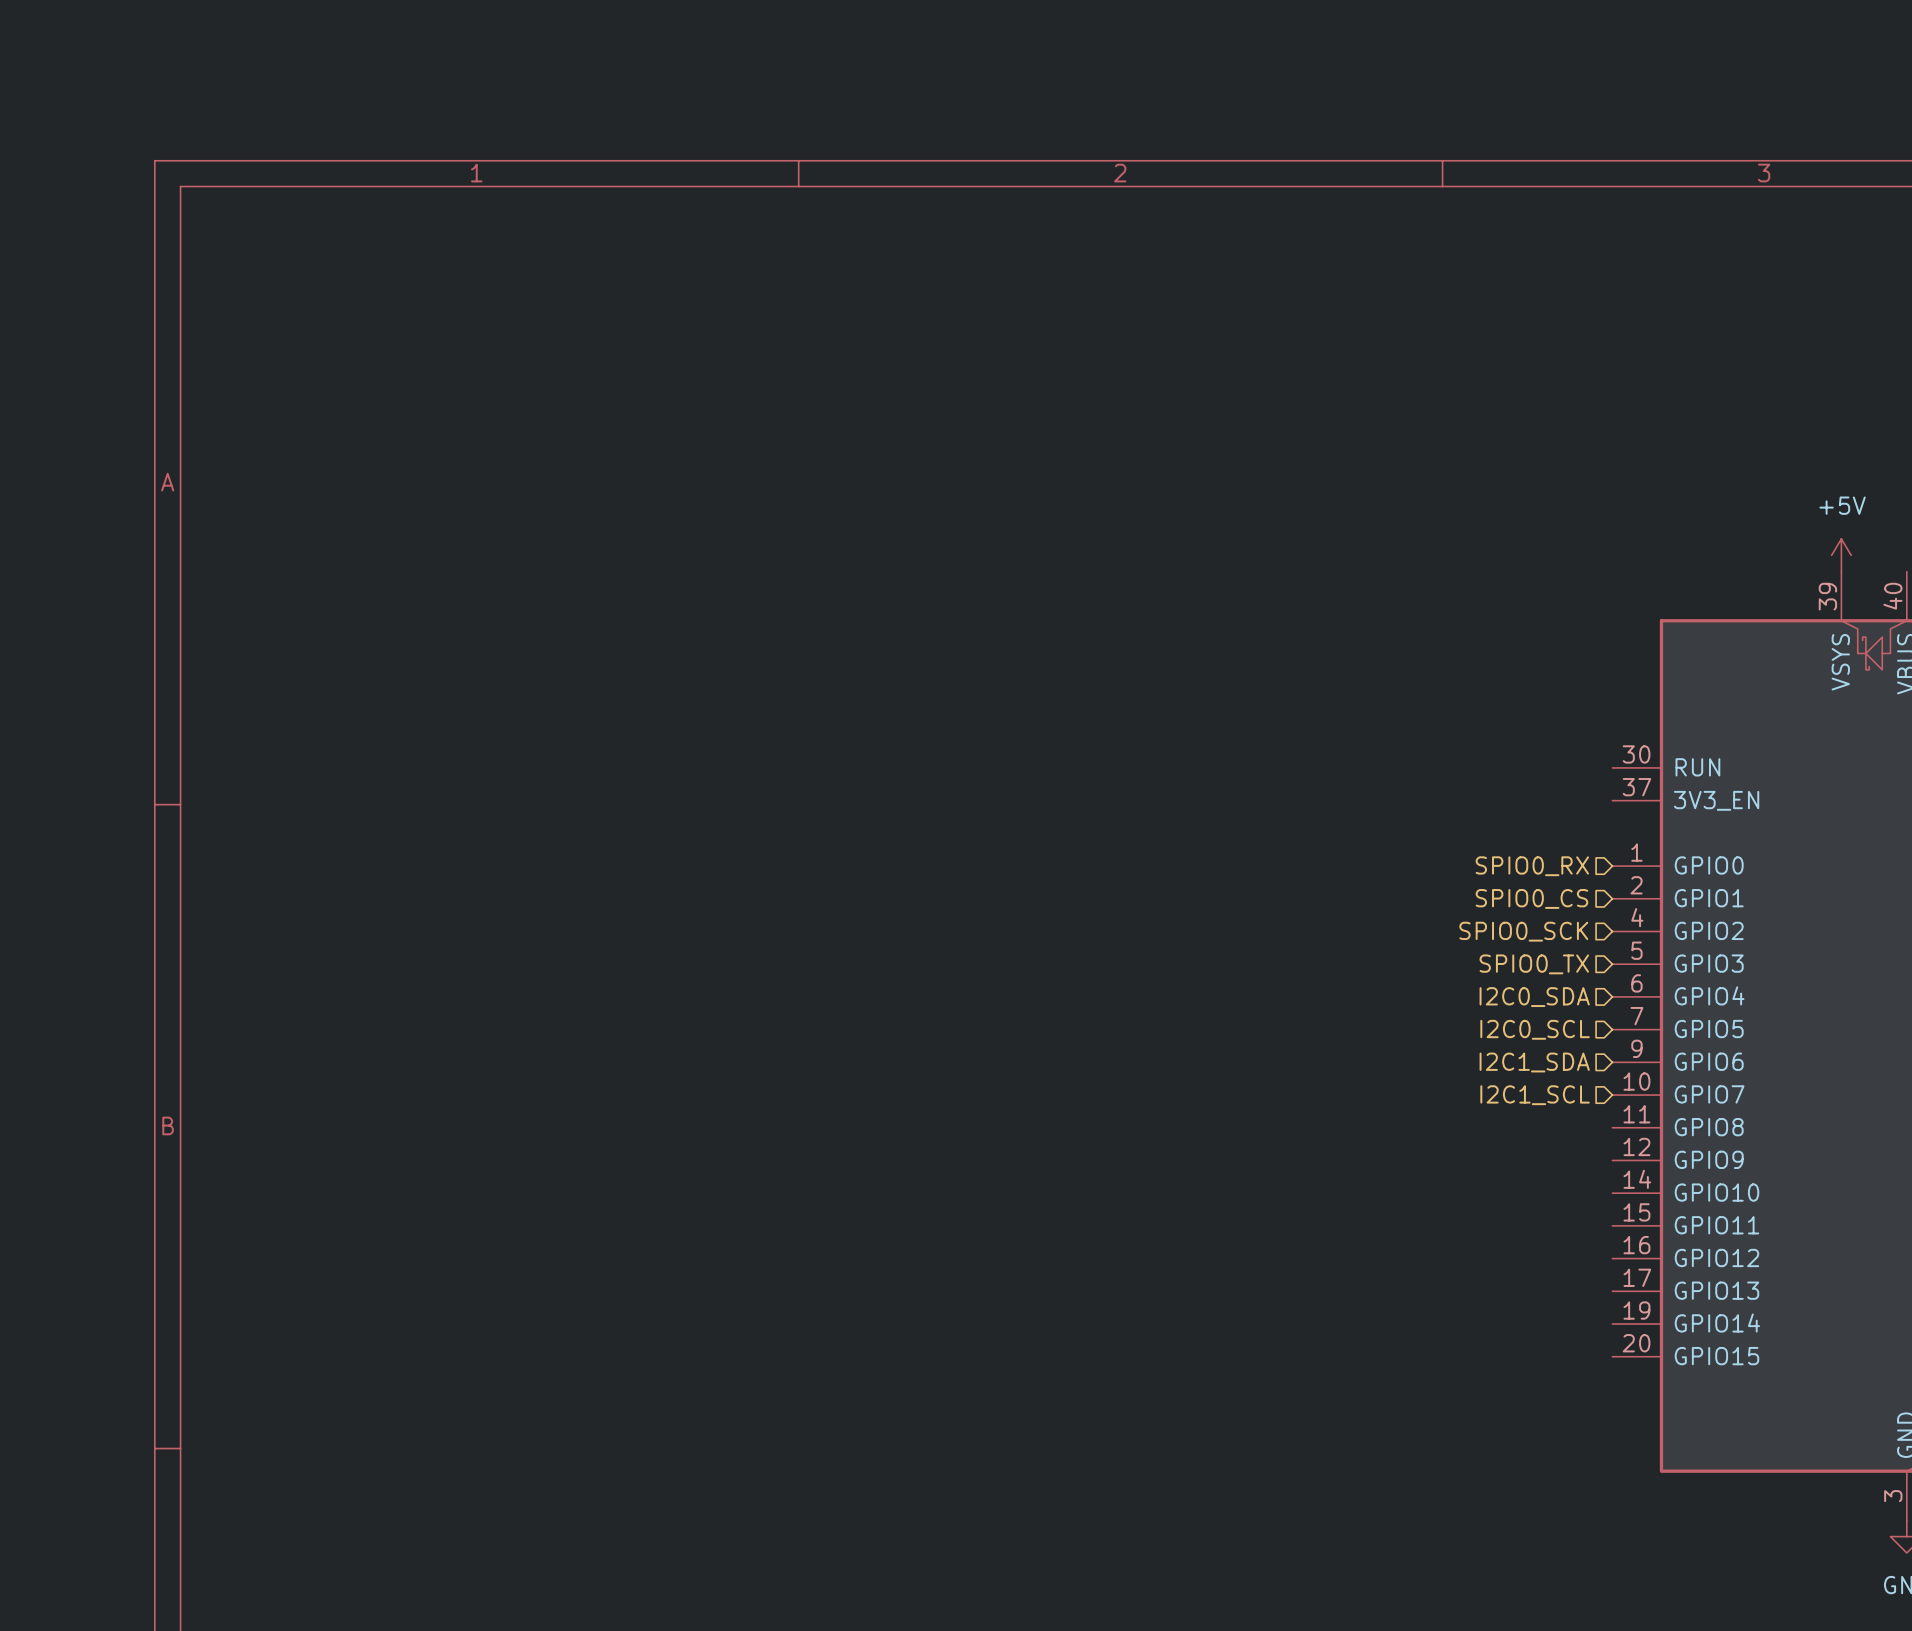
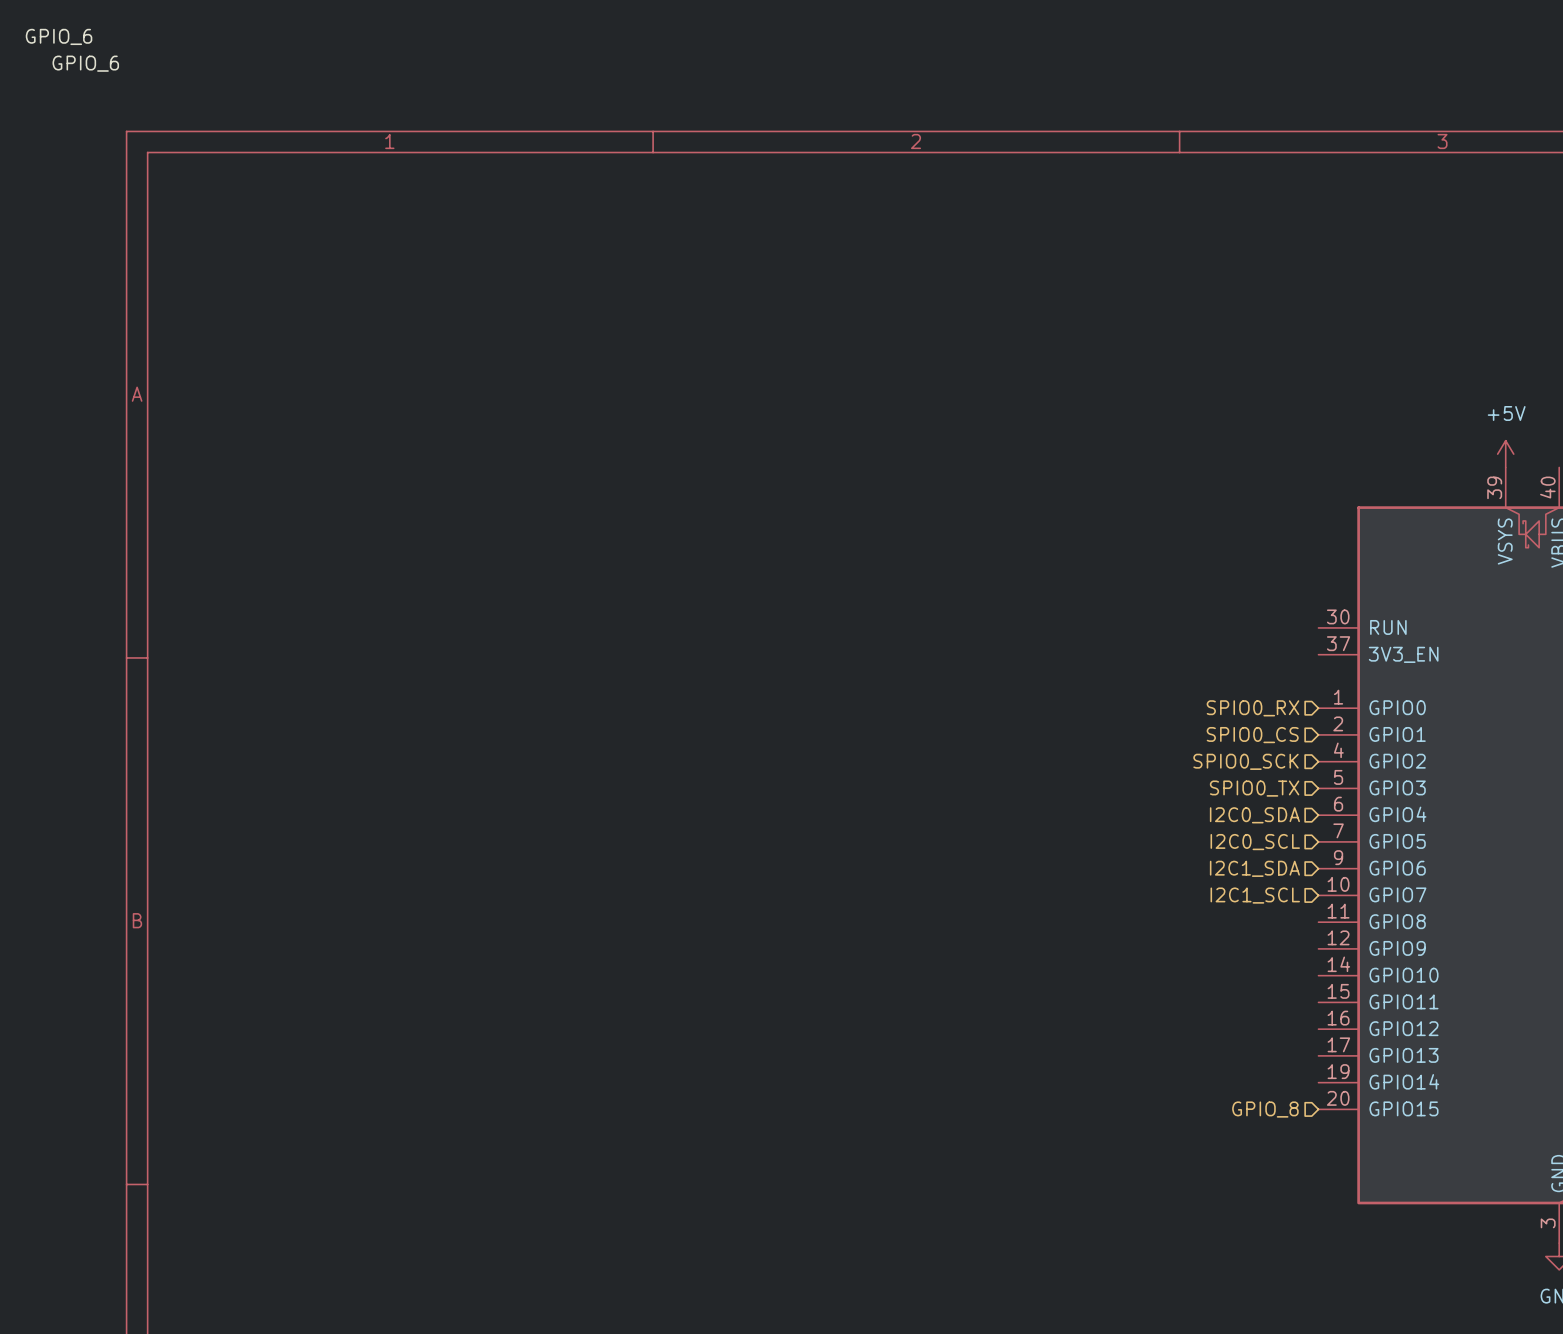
label: none -> GPIO_6 (59, 36)
label: none -> GPIO_6 (85, 63)
hierarchical label: none -> GPIO_8 (1265, 1109)

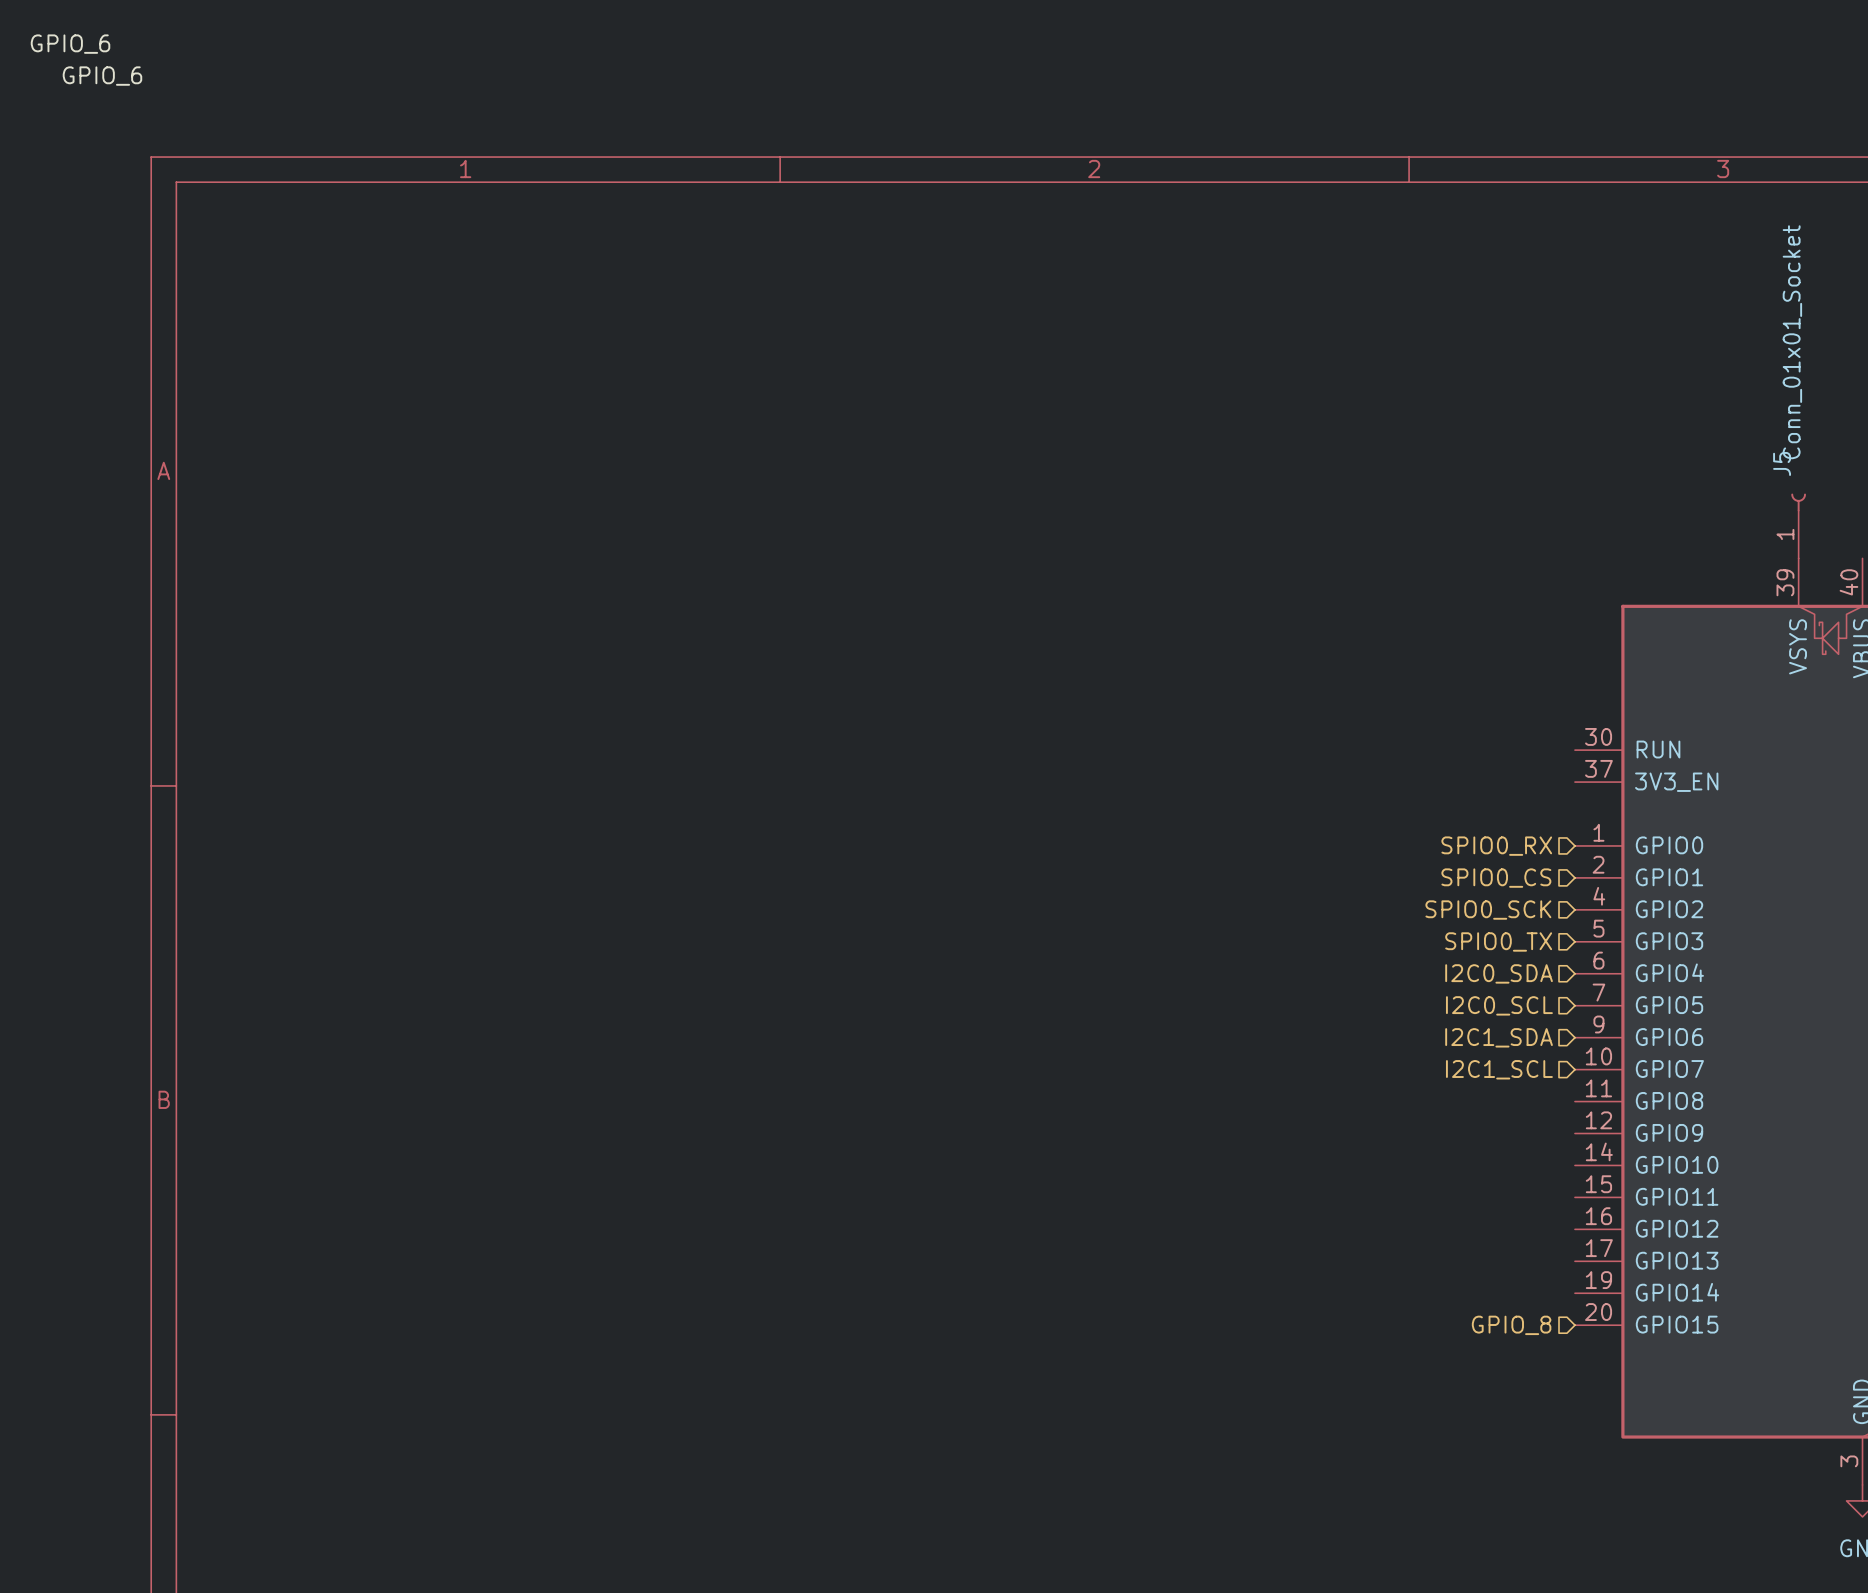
J5: none -> Conn_01x01_Socket (1798, 525)
power symbol: +5V (1505, 454) -> none

